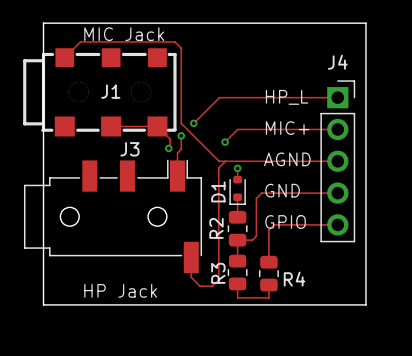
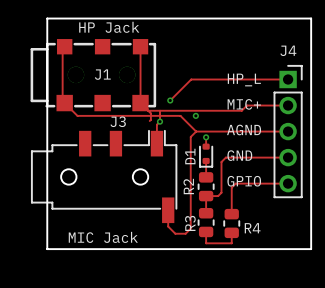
text: MIC Jack (124, 34) -> HP Jack (109, 27)
track: (64, 57) (80, 41) (174, 41) (181, 48) (181, 123) (219, 161) (225, 161) -> (67, 46) (62, 51) (62, 97) (64, 103) (77, 115) (180, 115) (196, 131)
track: (111, 126) (157, 126) -> (143, 46) (140, 49) (140, 103)
track: (287, 129) (237, 129) (225, 142) -> (247, 105) (241, 110) (148, 110)
via: (181, 135) -> none
via: (168, 148) -> none
via: none -> (160, 121)
text: HP Jack (120, 290) -> MIC Jack (103, 237)

